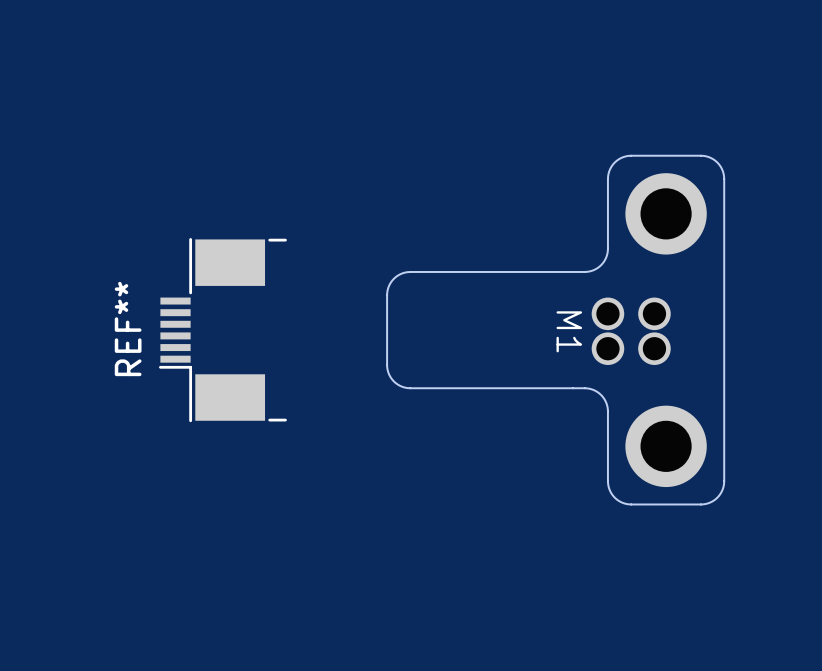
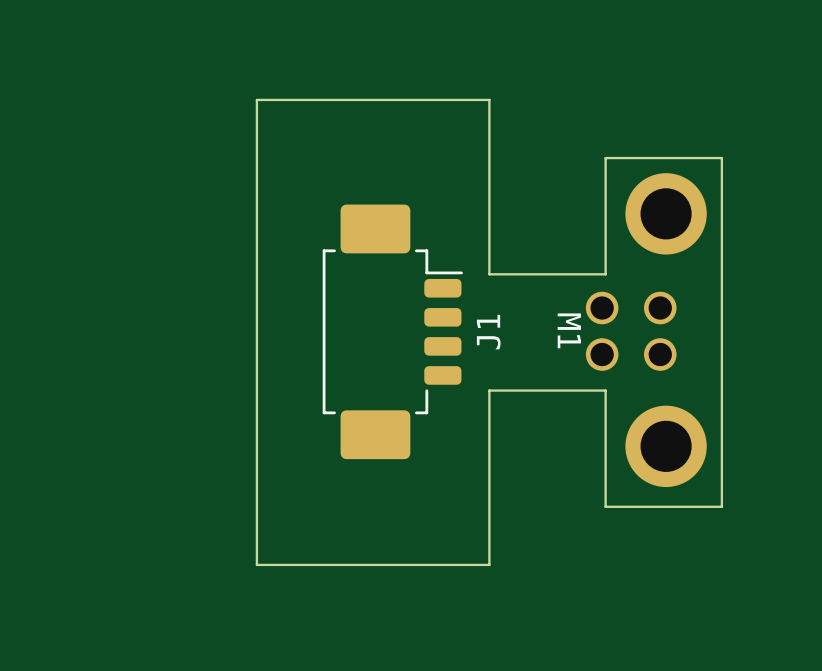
board edge: (631, 155) (706, 156) (717, 162) (723, 173) (724, 481) (719, 495) (706, 503) (628, 504) (614, 497) (608, 483) (607, 406) (602, 396) (594, 390) (584, 388) (407, 388) (393, 381) (387, 370) (387, 292) (389, 285) (395, 277) (410, 271) (584, 271) (594, 269) (604, 261) (607, 251) (609, 171) (616, 160) (631, 155) -> (256, 99) (256, 564) (489, 564) (489, 390) (605, 390) (605, 506) (721, 506) (721, 158) (605, 158) (605, 274) (489, 274) (489, 99) (256, 99)
M1 footprint: [591, 297, 671, 365] -> [585, 291, 677, 371]
REF**: (222, 330) -> none
J1: none -> (392, 331)

